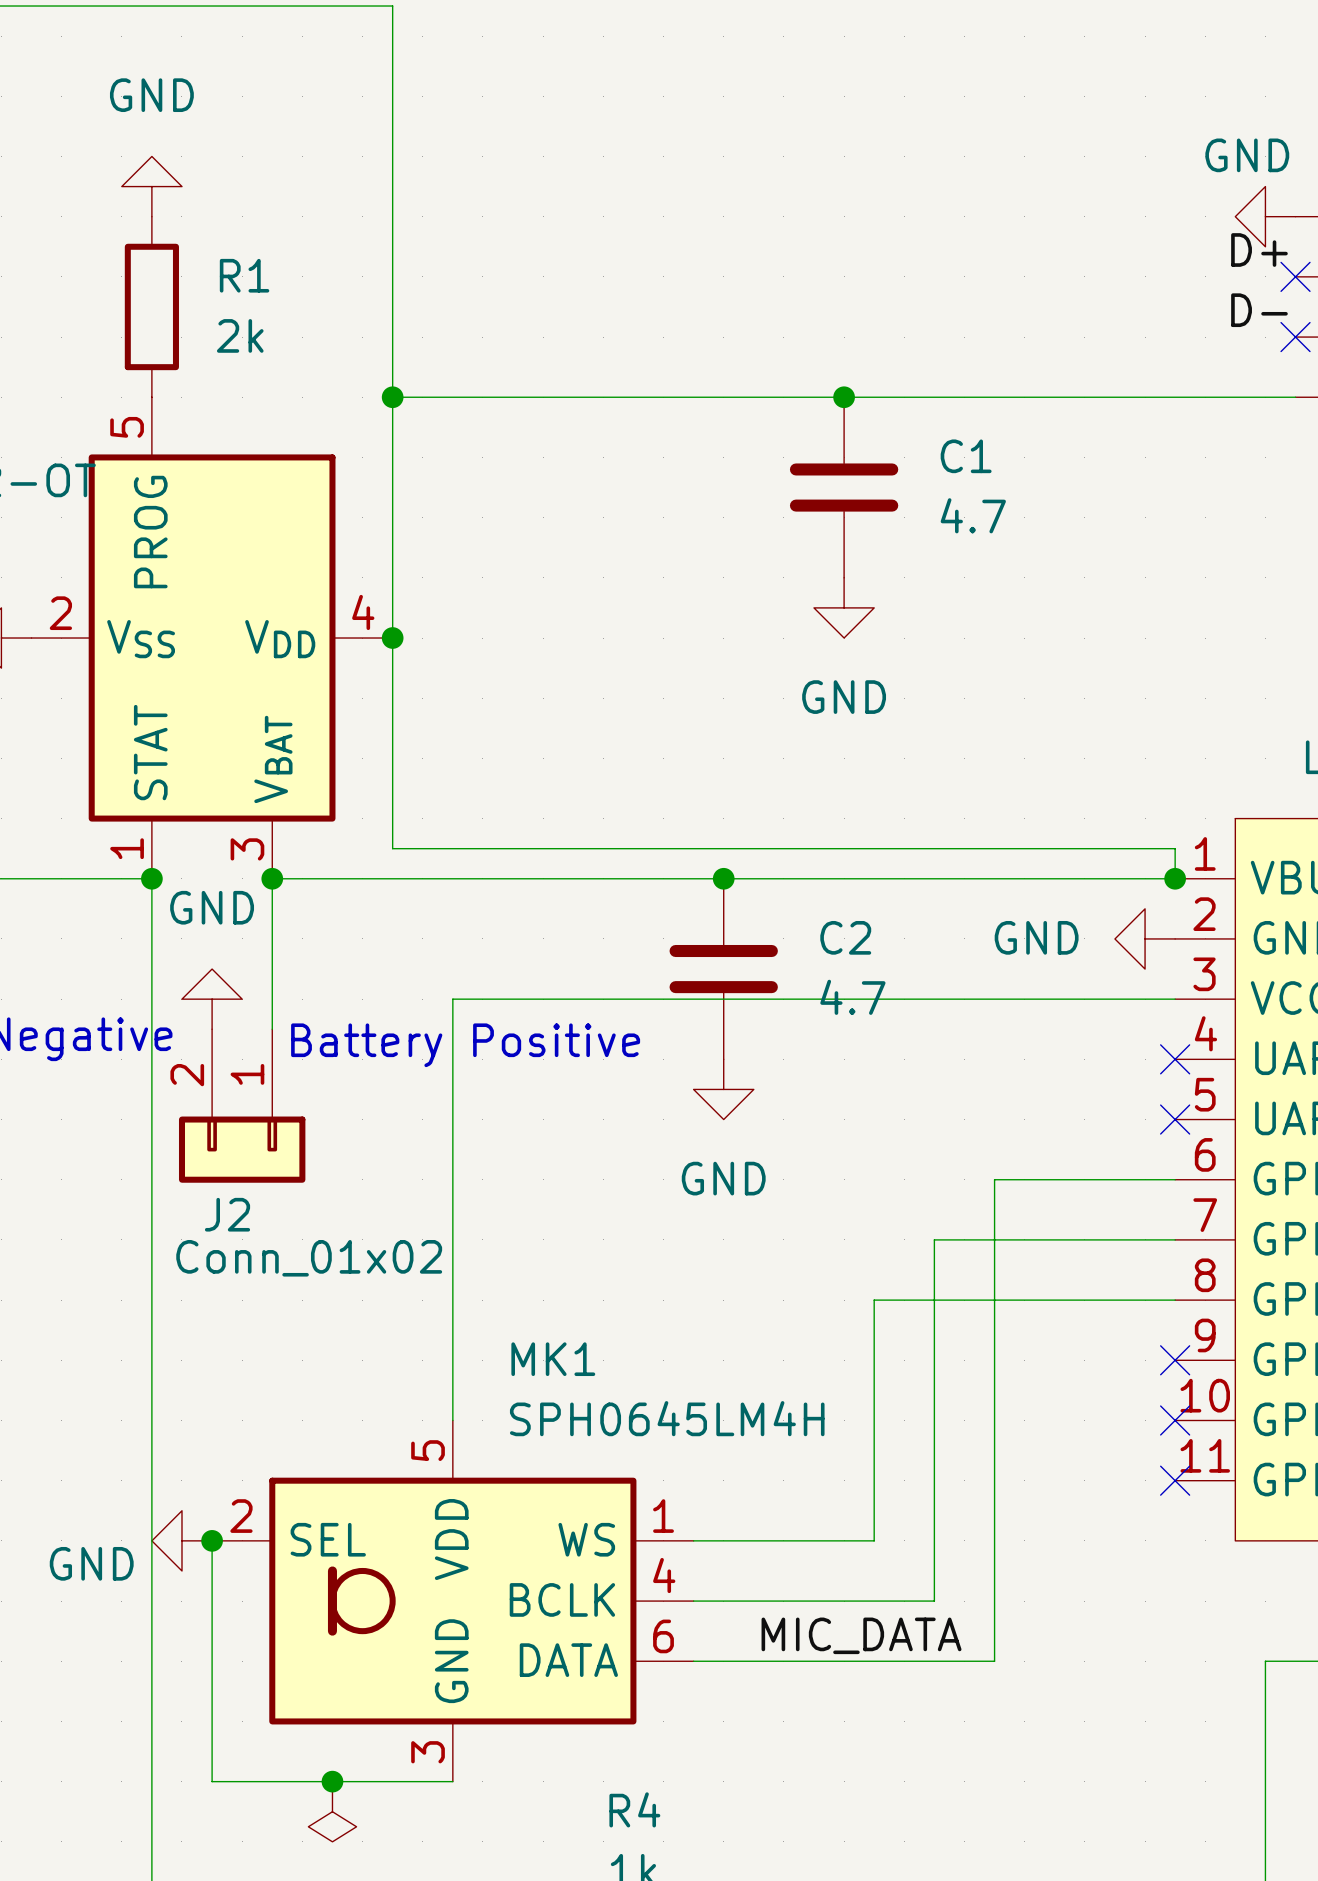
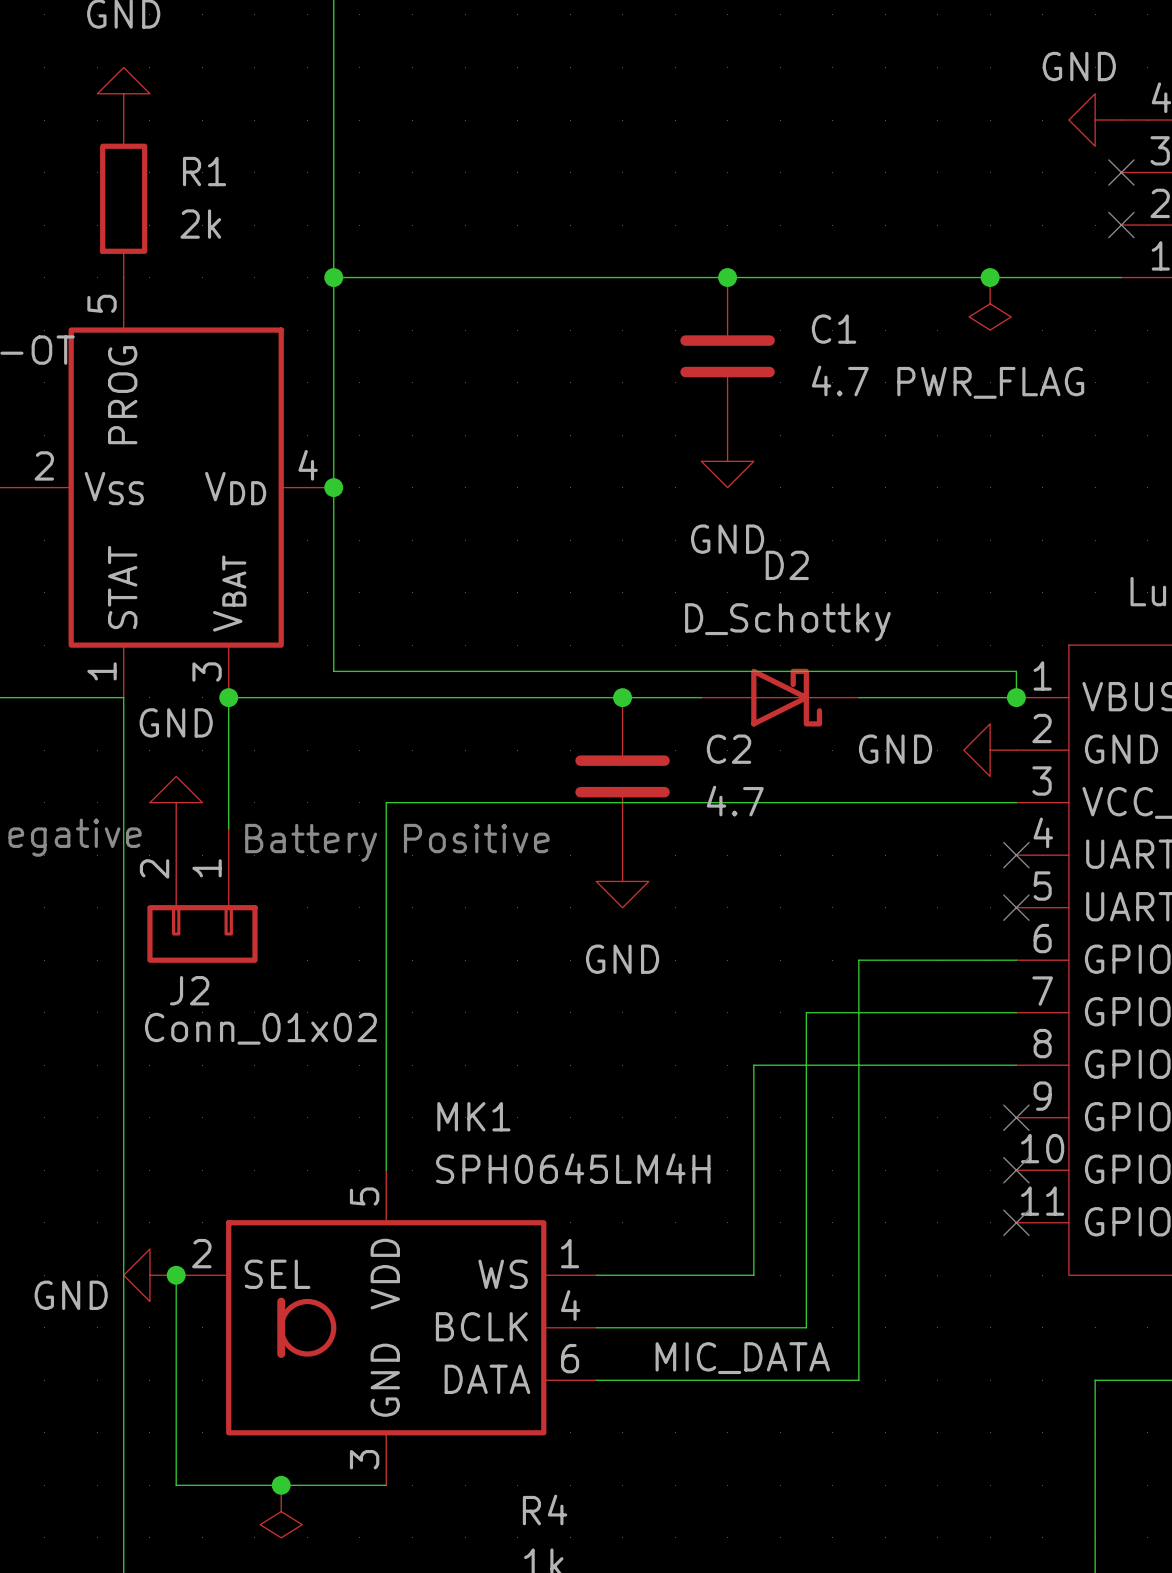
label: D+ (1259, 250) -> none
label: D- (1259, 310) -> none
junction: none -> (990, 277)
power symbol: none -> PWR_FLAG (990, 303)
junction: (151, 878) -> none
D2: none -> D_Schottky (780, 697)

